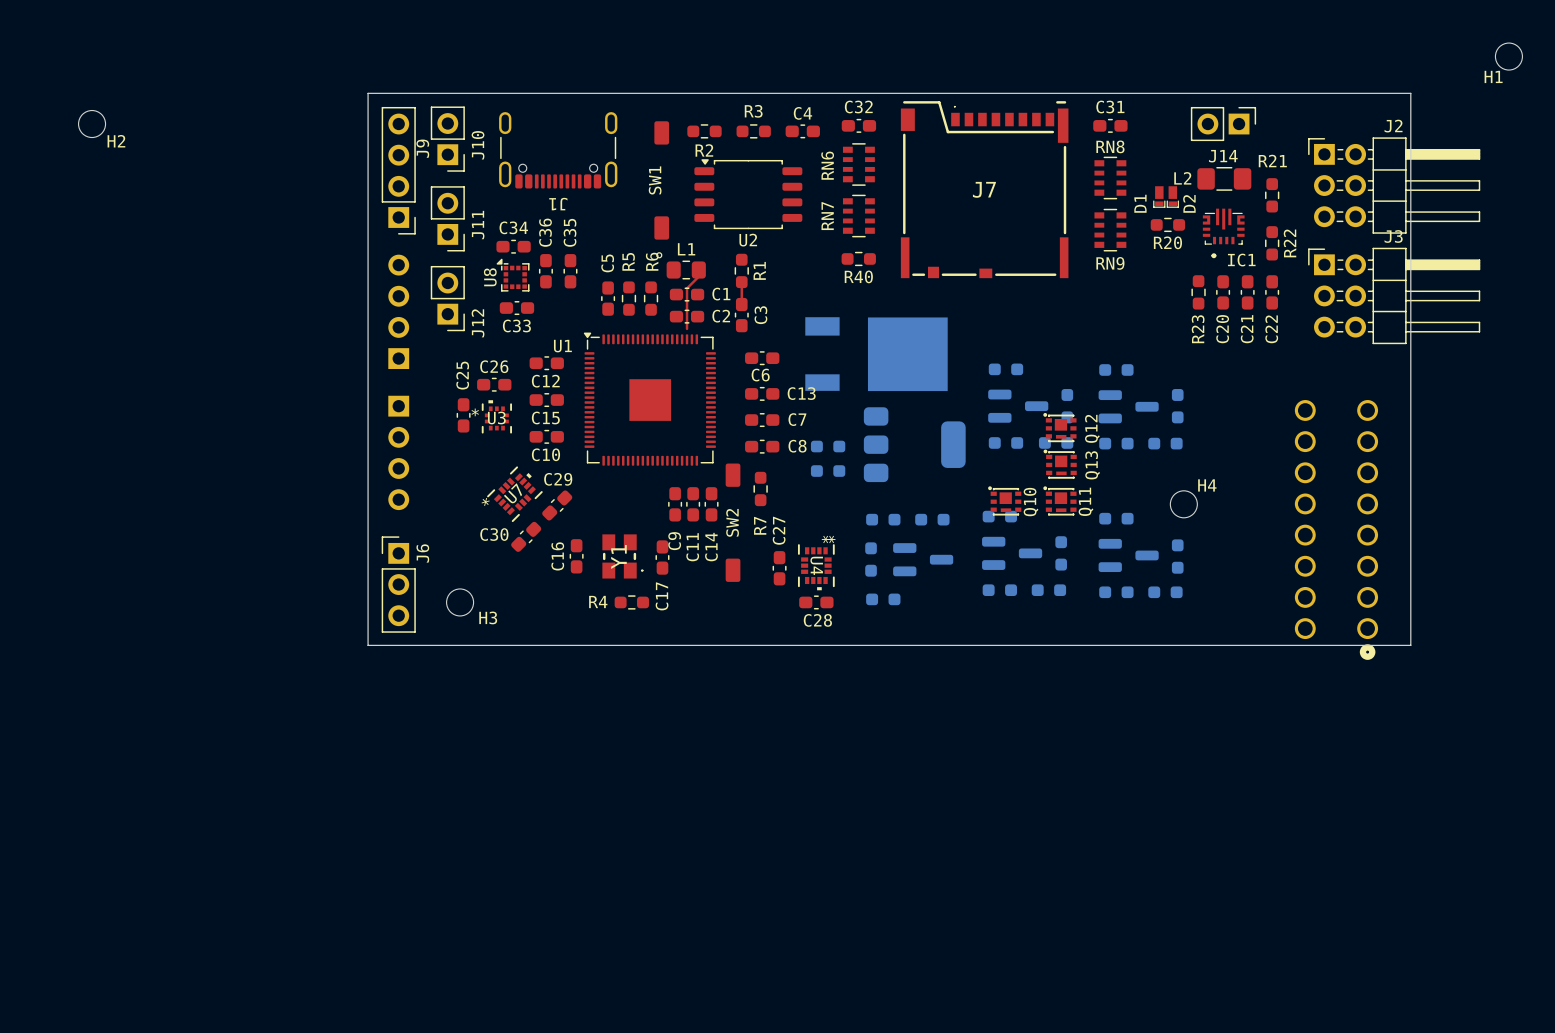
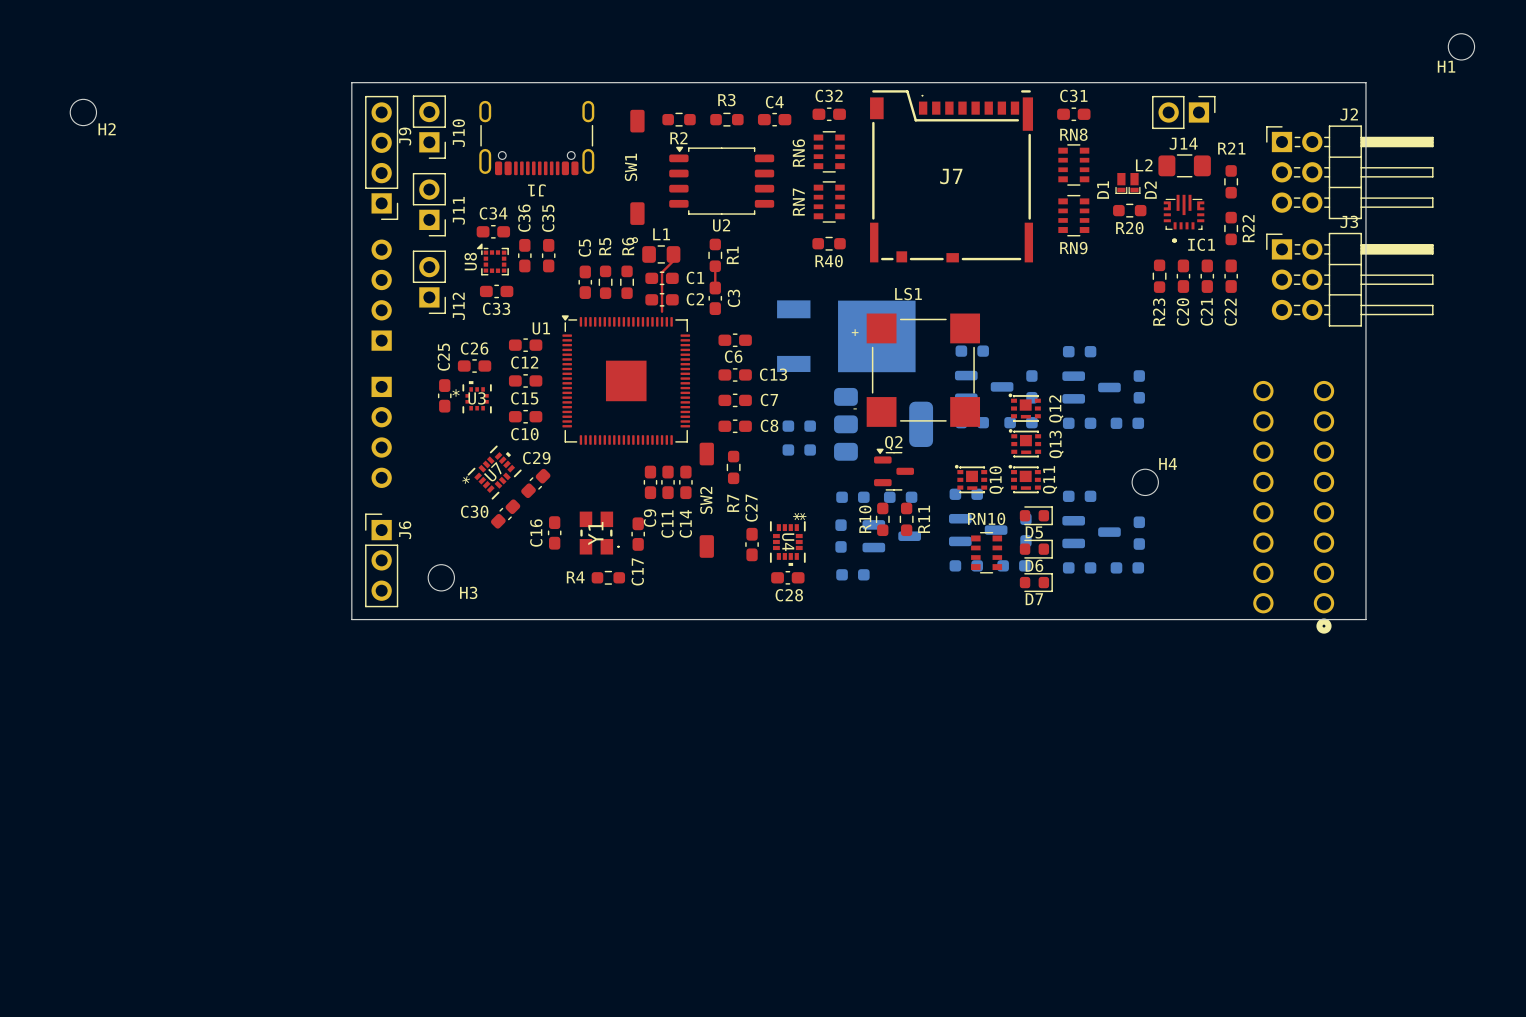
LS1: none -> (923, 370)
Q2: none -> (894, 469)
D5: none -> (1036, 515)
R10: none -> (882, 519)
R11: none -> (906, 519)
D6: none -> (1036, 549)
RN10: none -> (986, 552)
D7: none -> (1036, 582)

